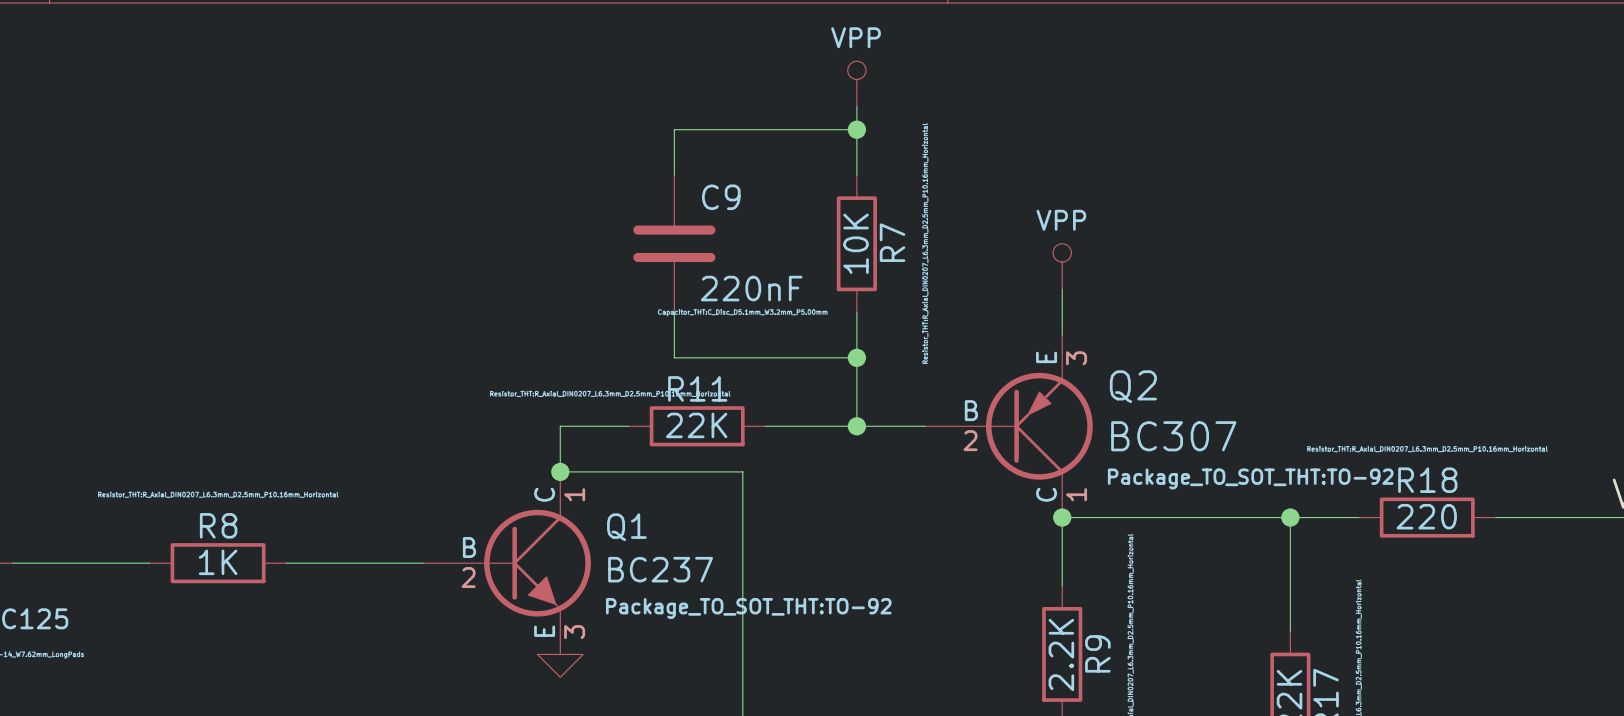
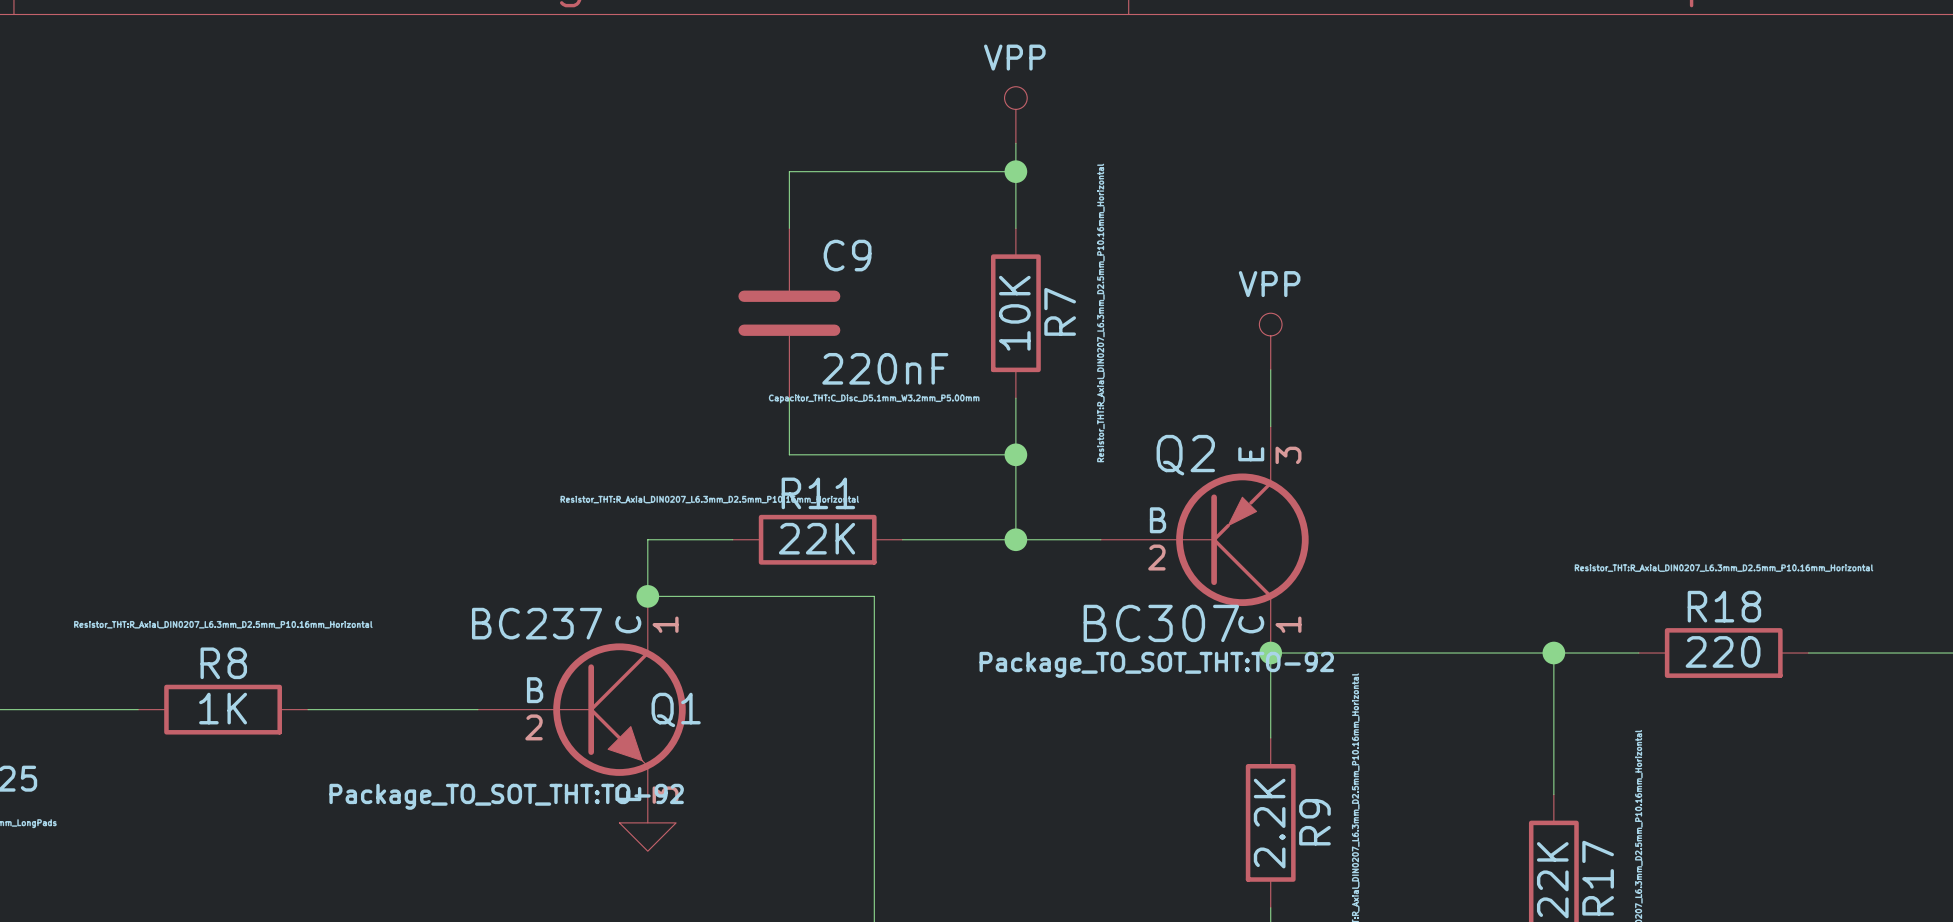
Q2 name position: Q2 (1133, 386) -> Q2 (1185, 455)
Q2 value position: BC307 (1173, 436) -> BC307 (1161, 623)
Q2 text position: Package_TO_SOT_THT:TO-92 (1250, 478) -> Package_TO_SOT_THT:TO-92 (1156, 664)
Q1 name position: Q1 (626, 527) -> Q1 (676, 709)
Q1 value position: BC237 (660, 569) -> BC237 (537, 623)
Q1 text position: Package_TO_SOT_THT:TO-92 (748, 608) -> Package_TO_SOT_THT:TO-92 (506, 796)

